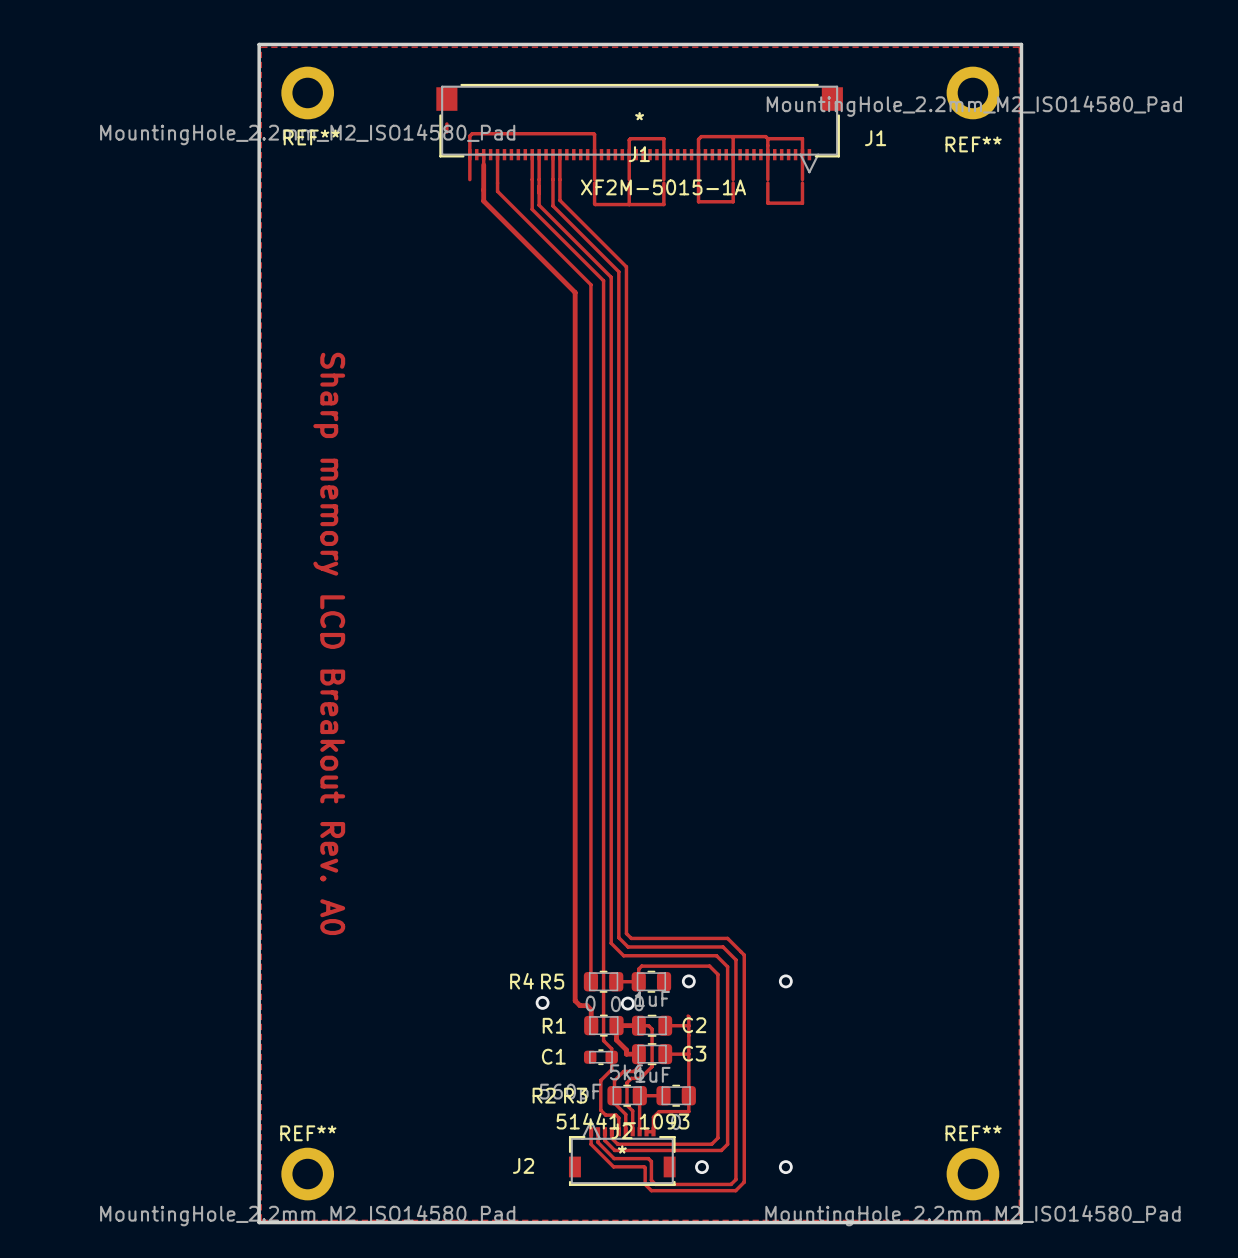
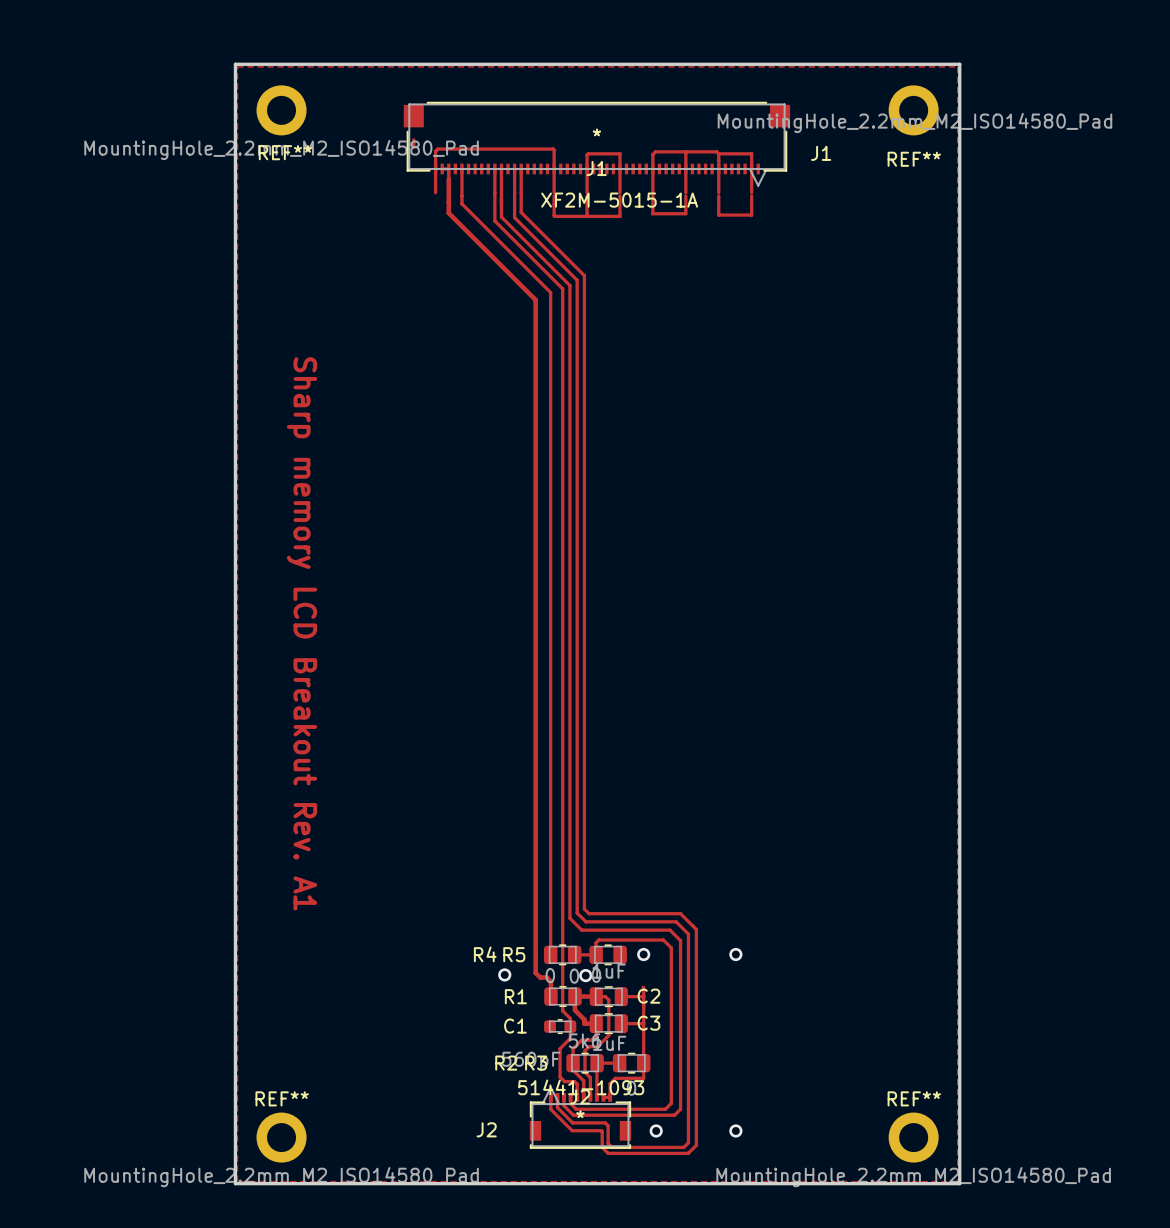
text: Sharp memory LCD Breakout Rev. A0 (329, 643) -> Sharp memory LCD Breakout Rev. A1 (302, 633)

